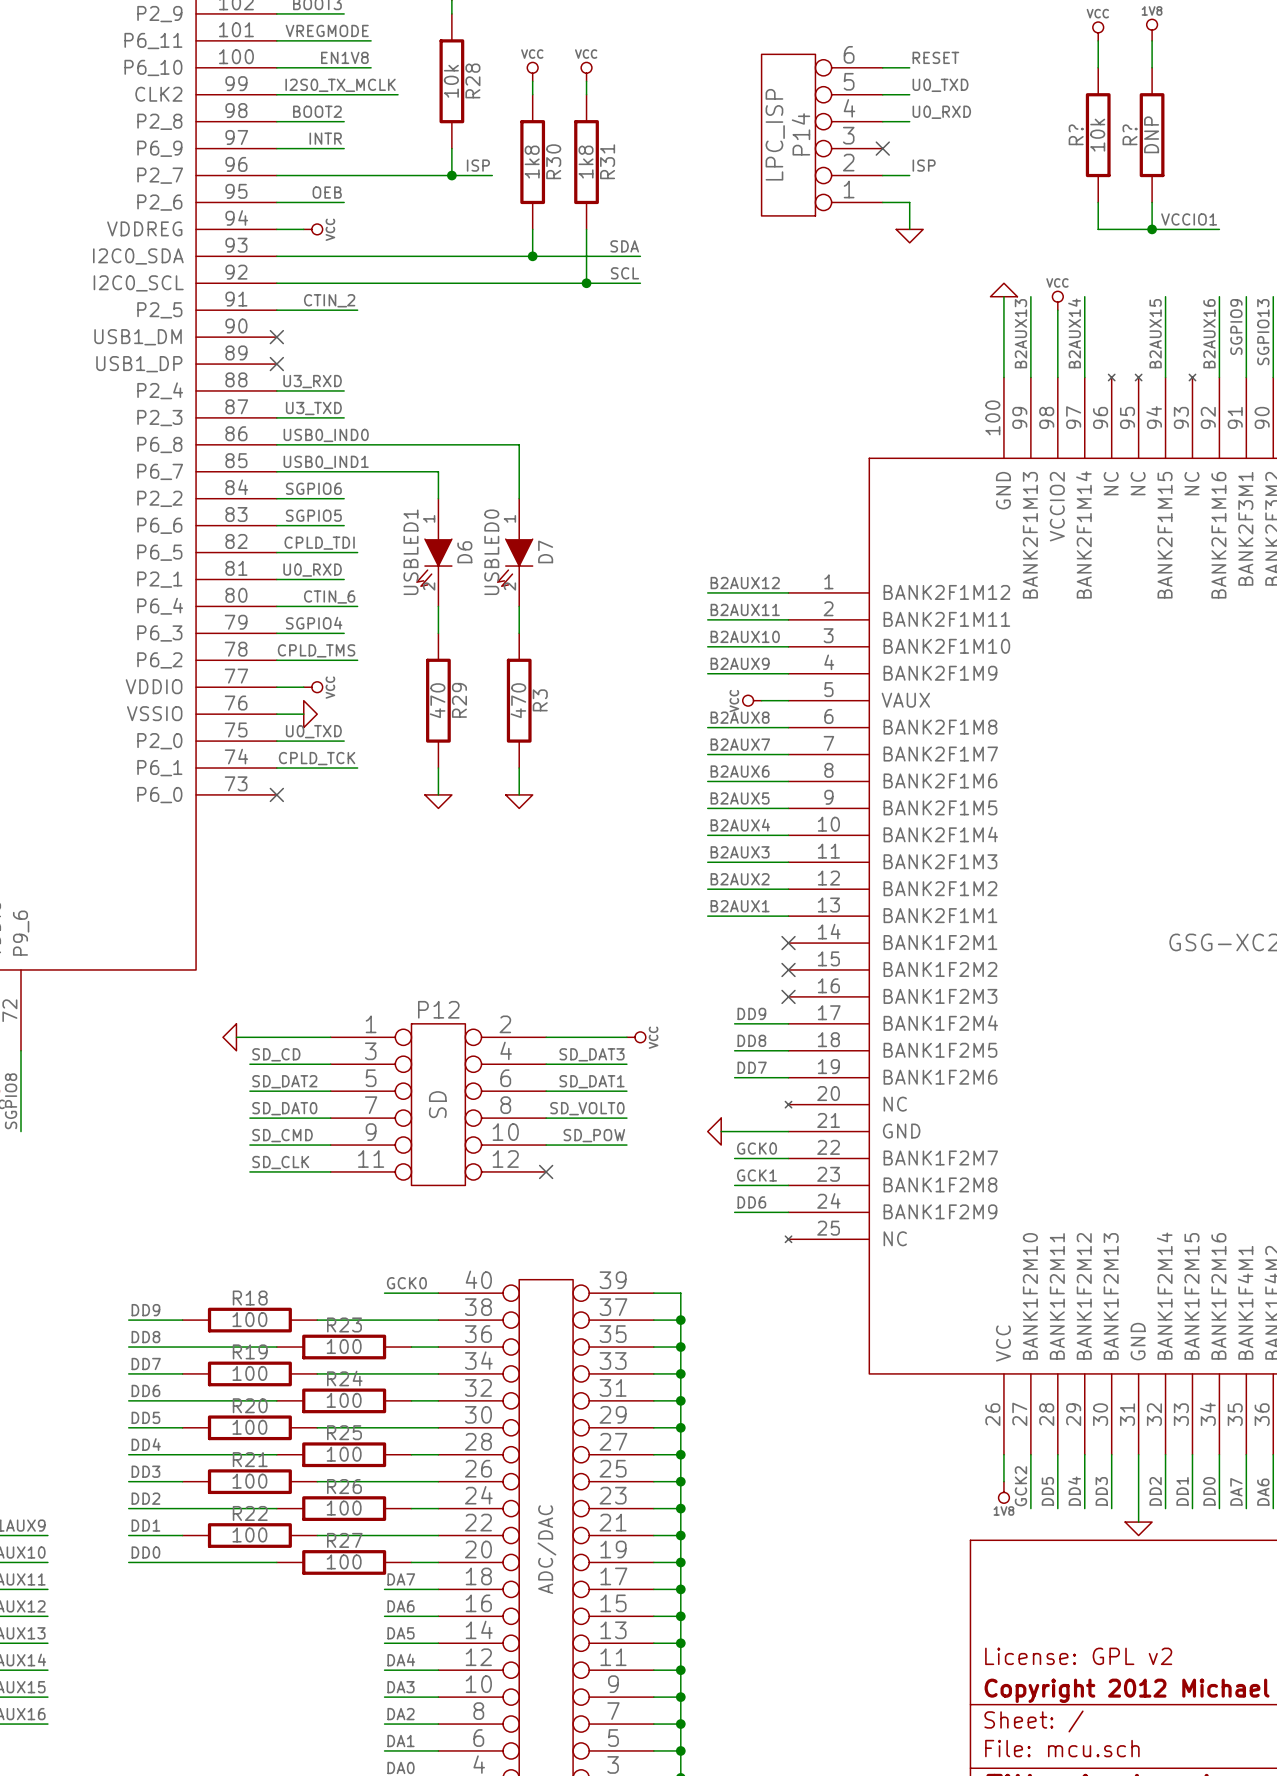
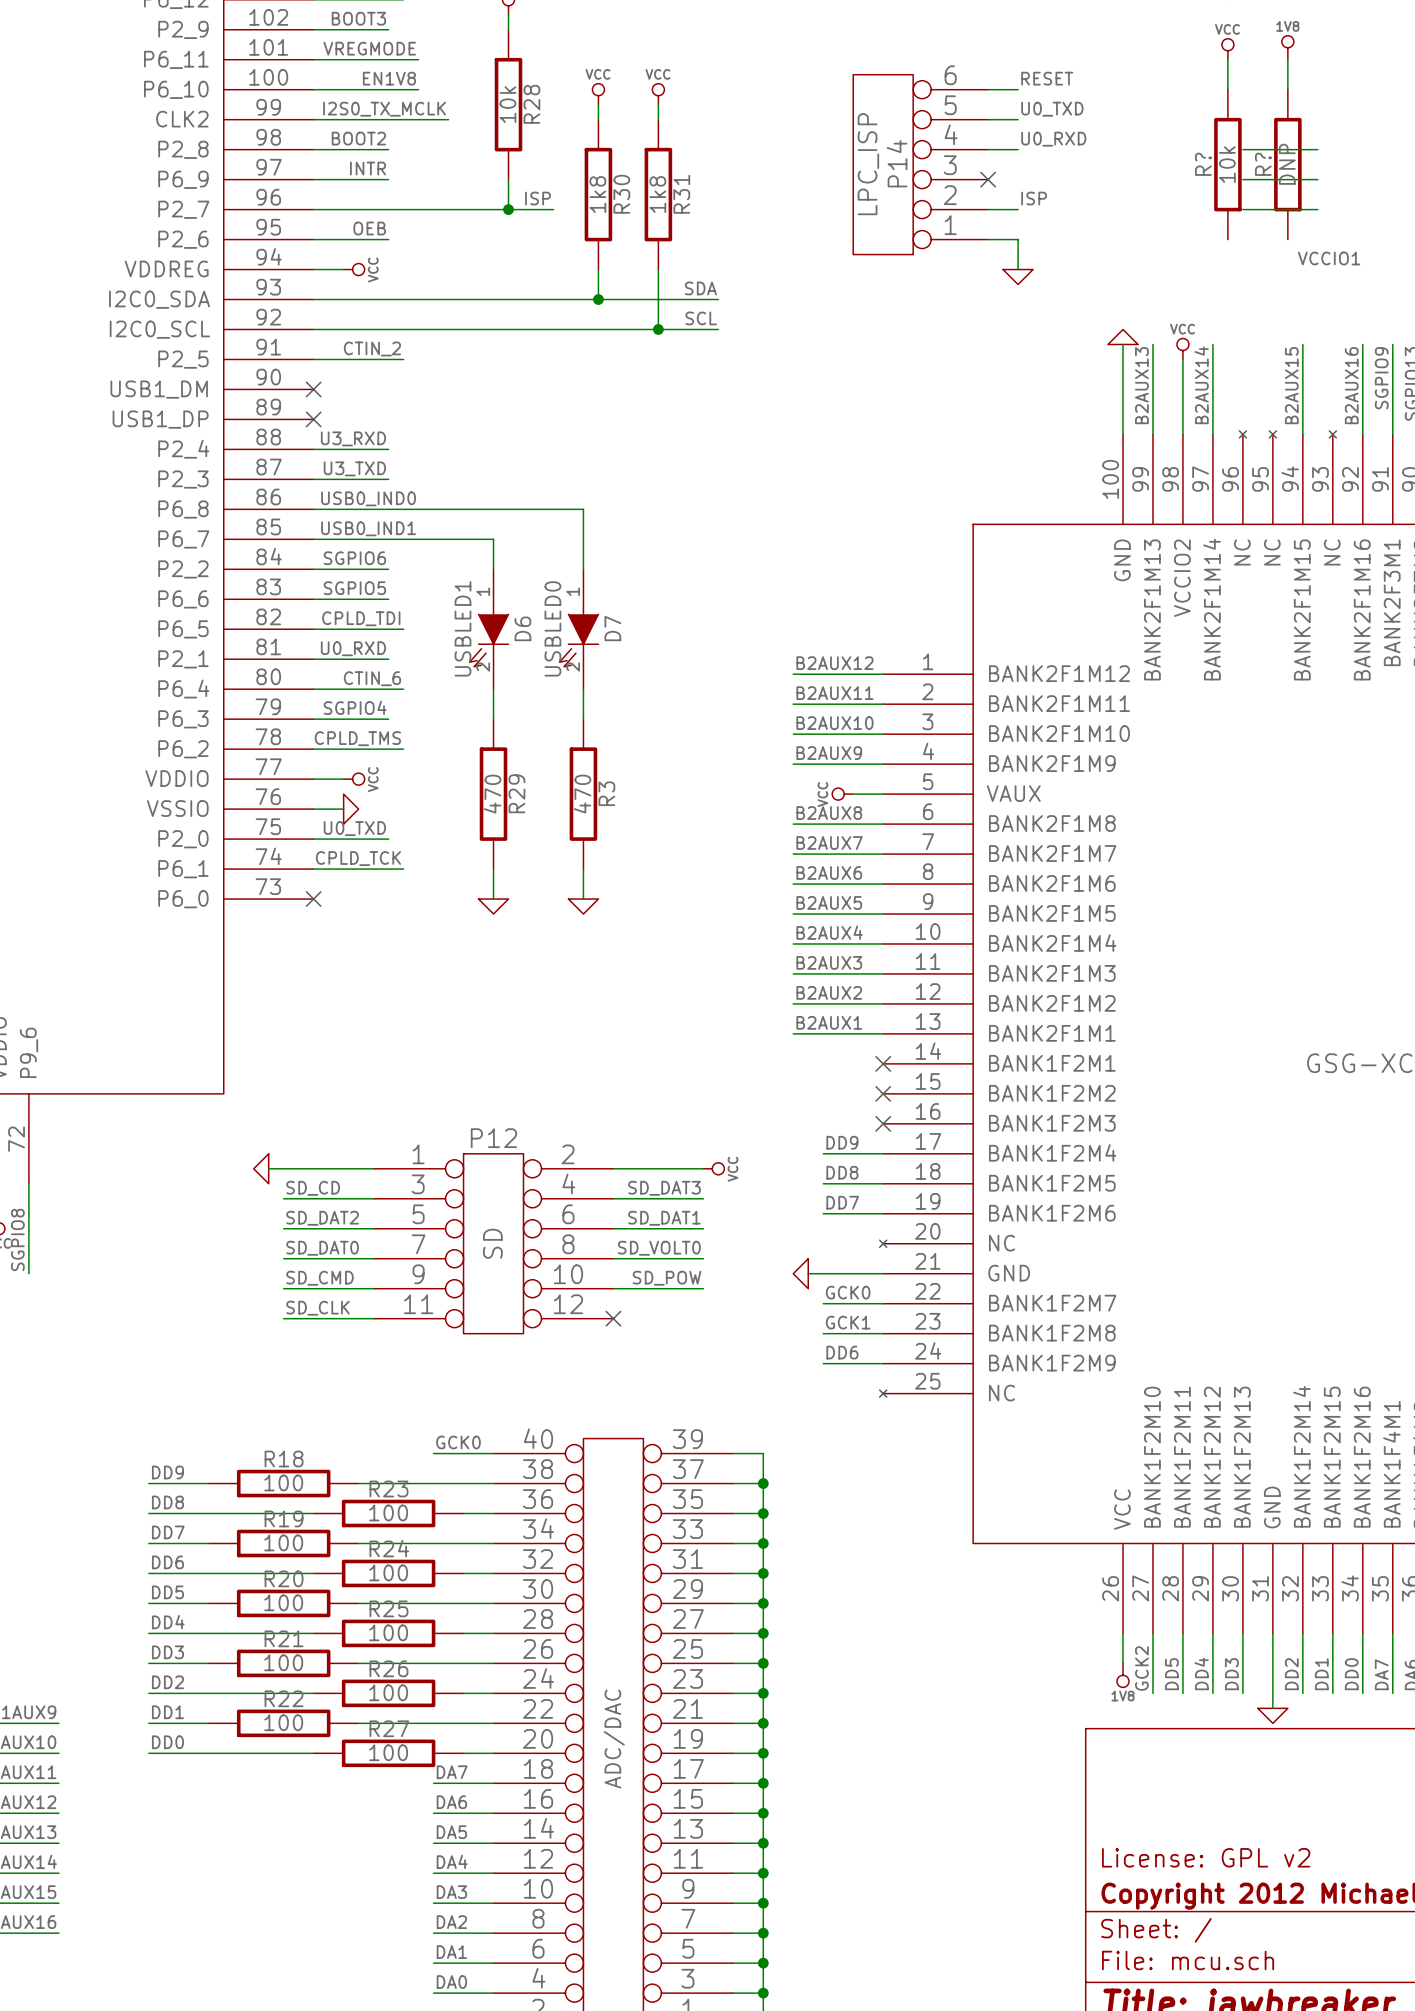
wire: none -> (1242, 149) (1317, 149)
wire: none -> (1242, 179) (1317, 179)
wire: none -> (1242, 209) (1317, 209)
wire: (1098, 202) (1098, 229) (1219, 229) -> none
wire: (1152, 202) (1152, 229) -> none
junction: (1152, 229) -> none

